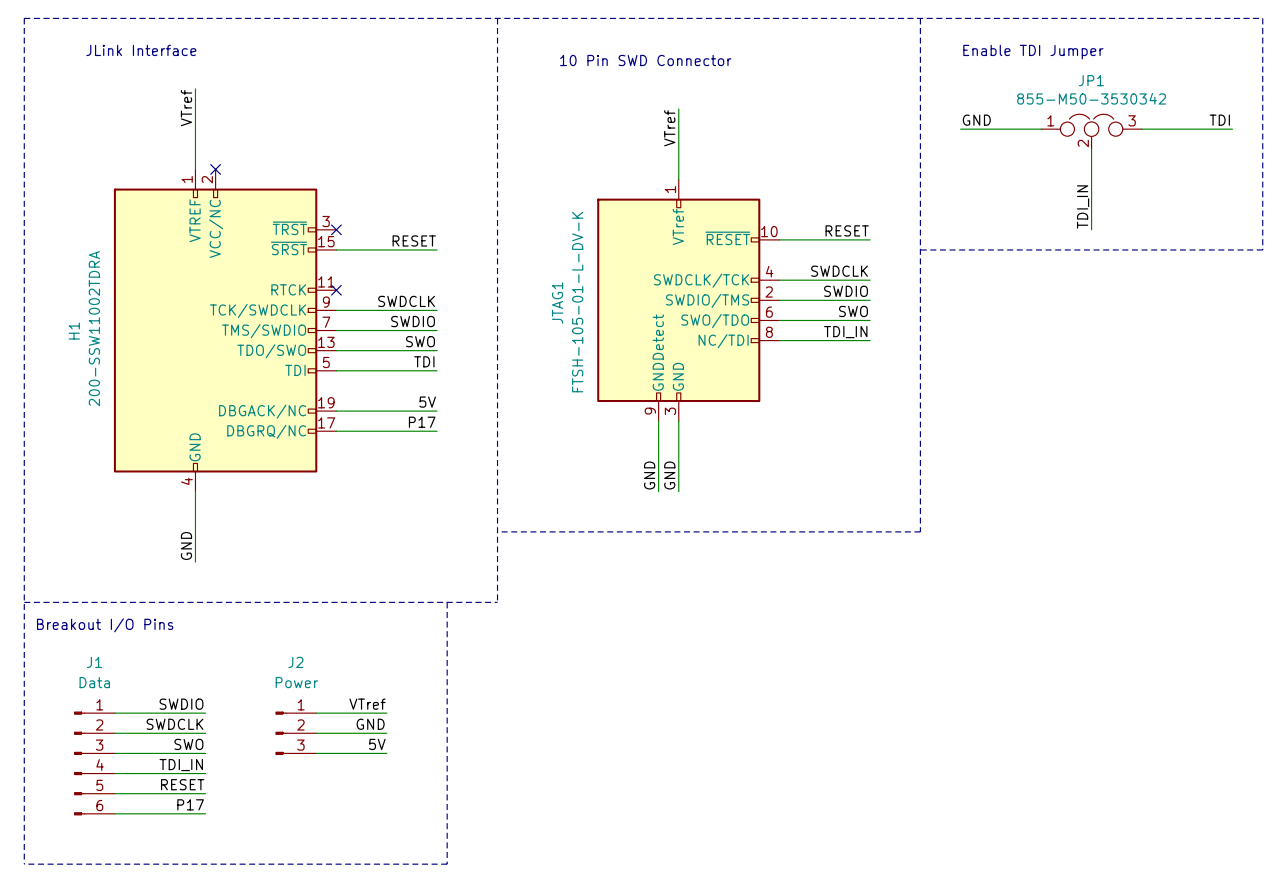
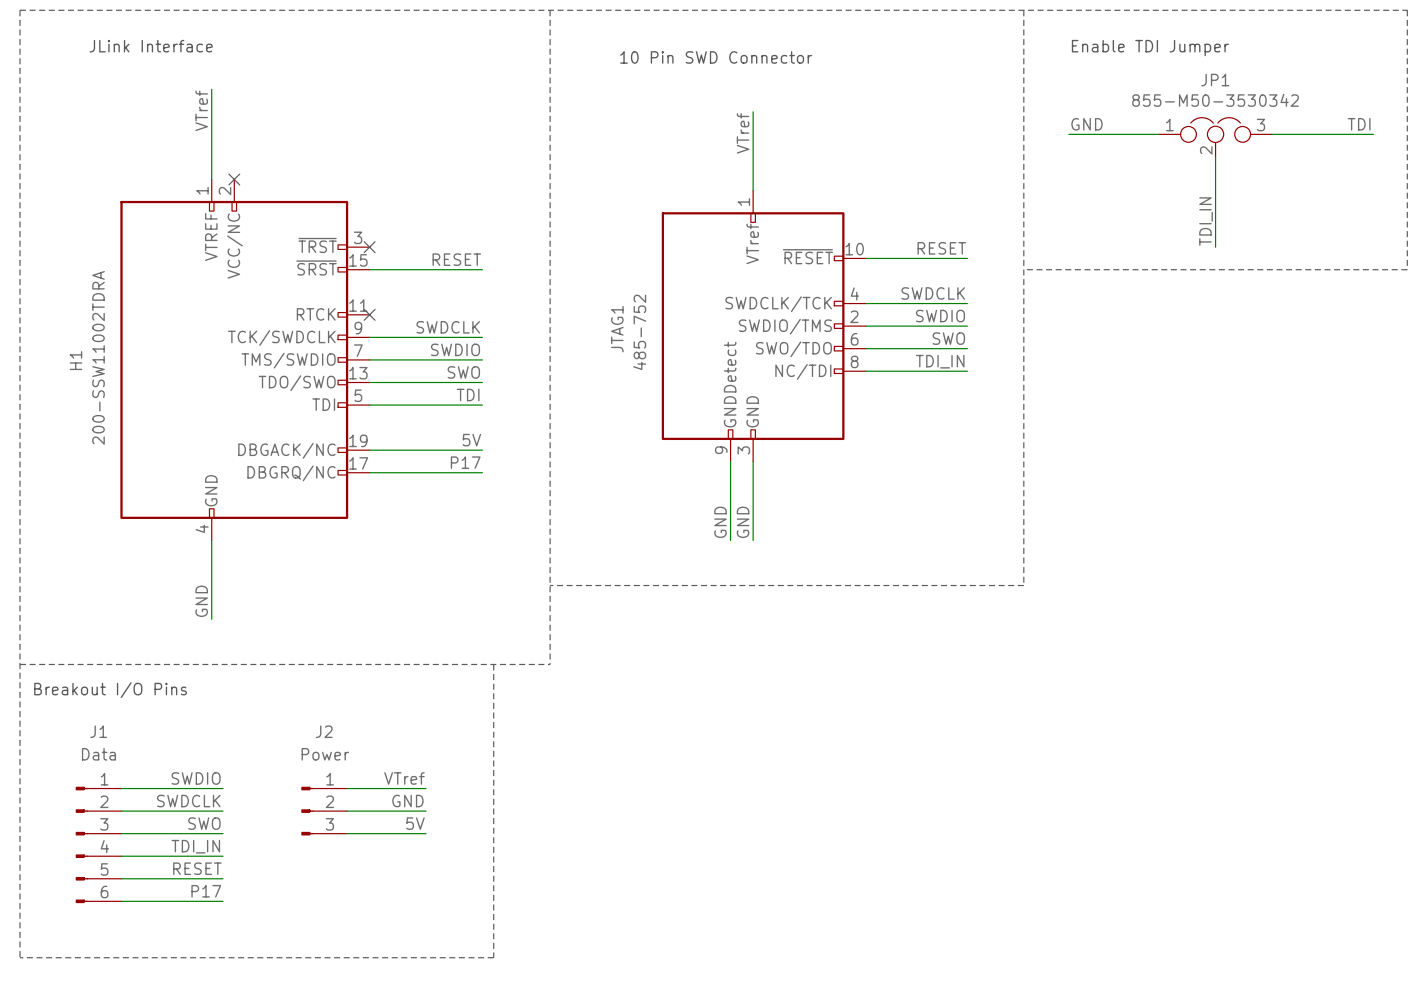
JTAG1 value: FTSH-105-01-L-DV-K (577, 302) -> 485-752 (639, 332)

